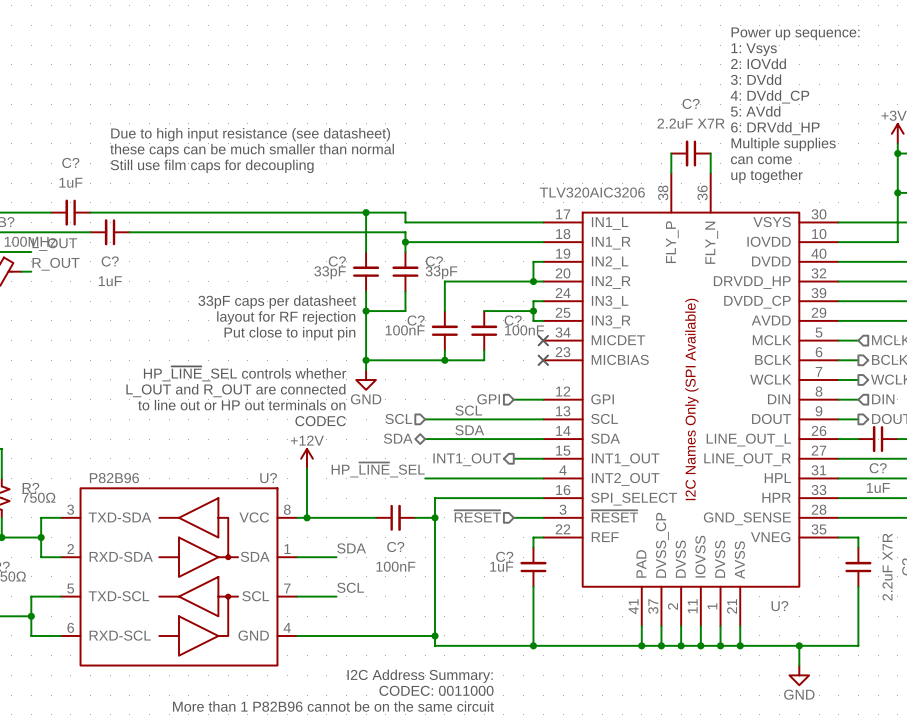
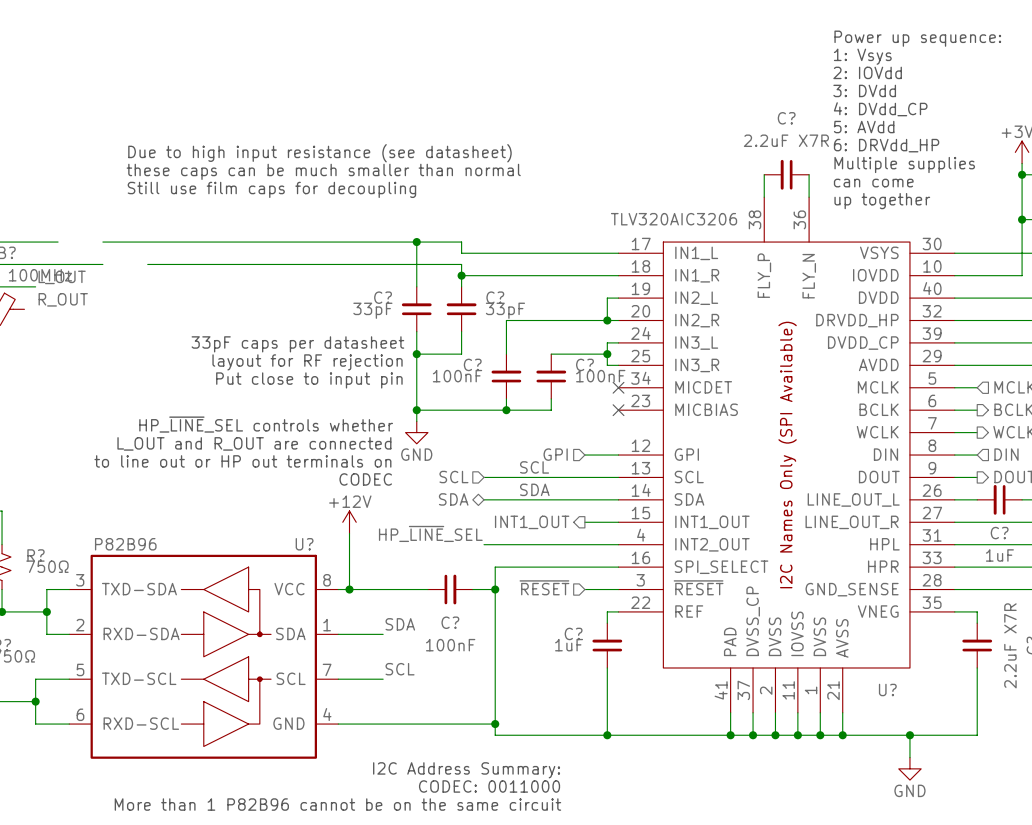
C?: 1uF (70, 212) -> none
C?: 1uF (110, 232) -> none
wire: (21, 271) (31, 271) -> none

